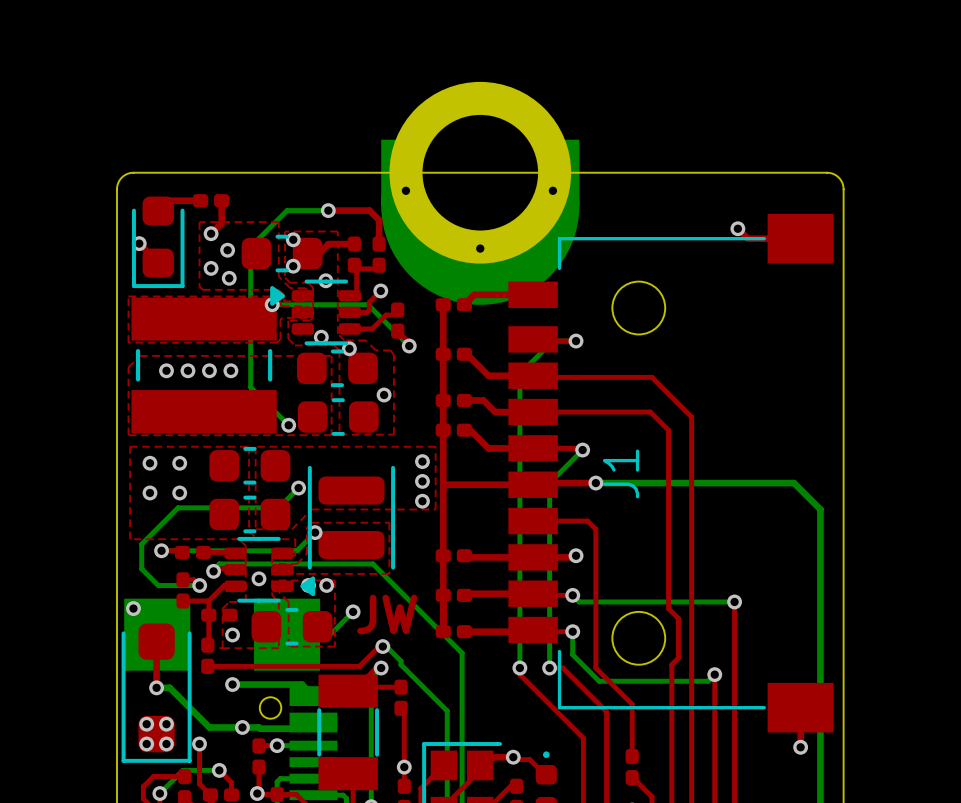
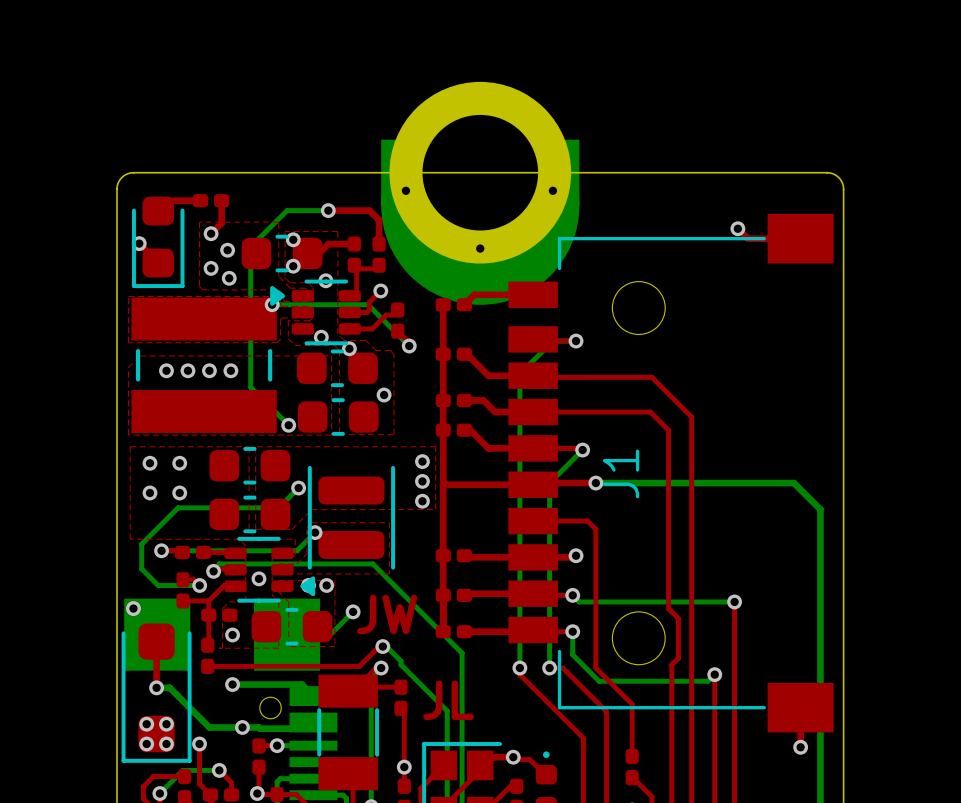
text: none -> JL (448, 700)

